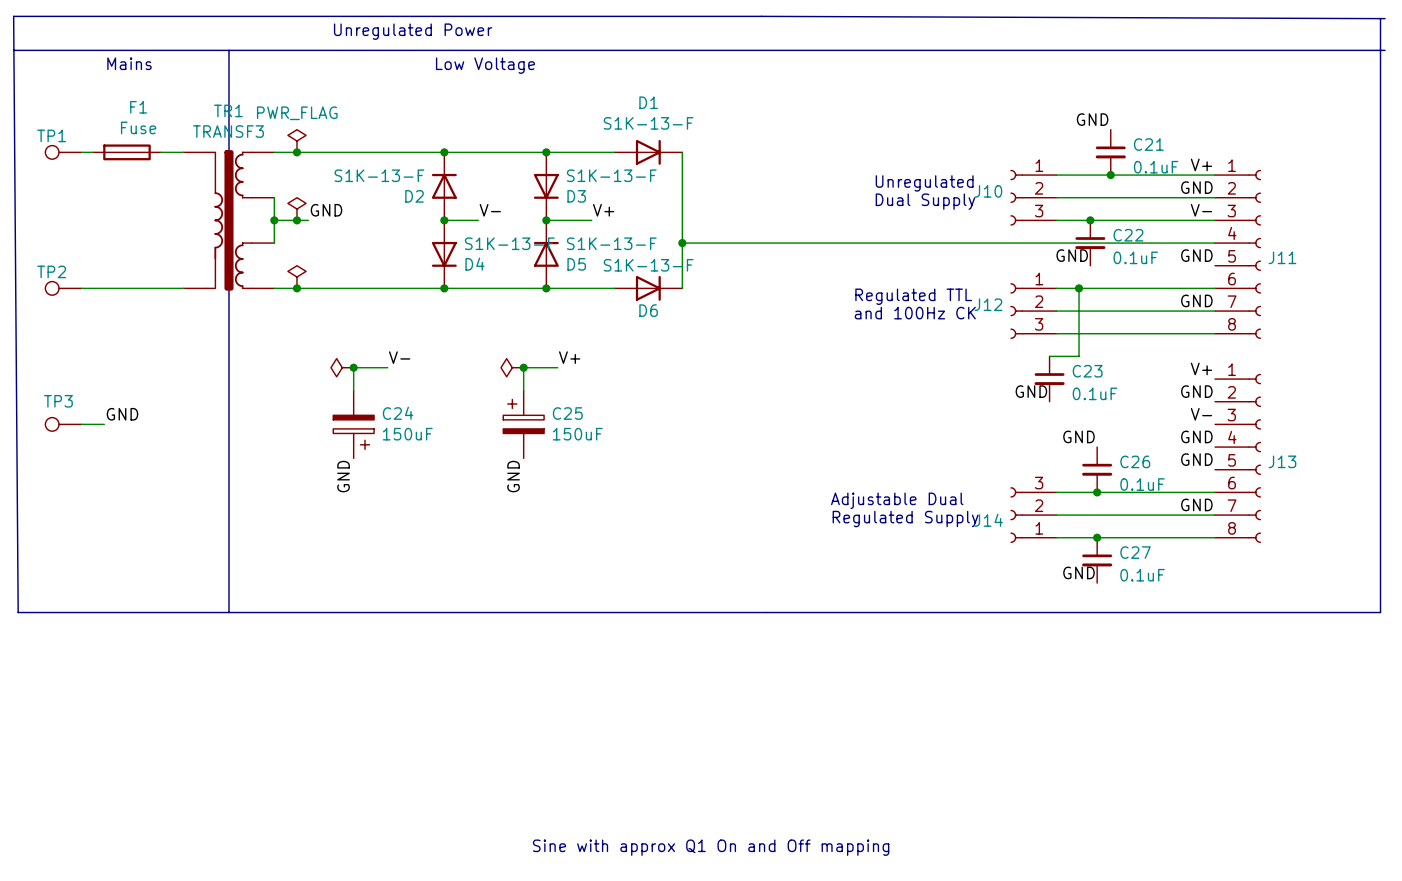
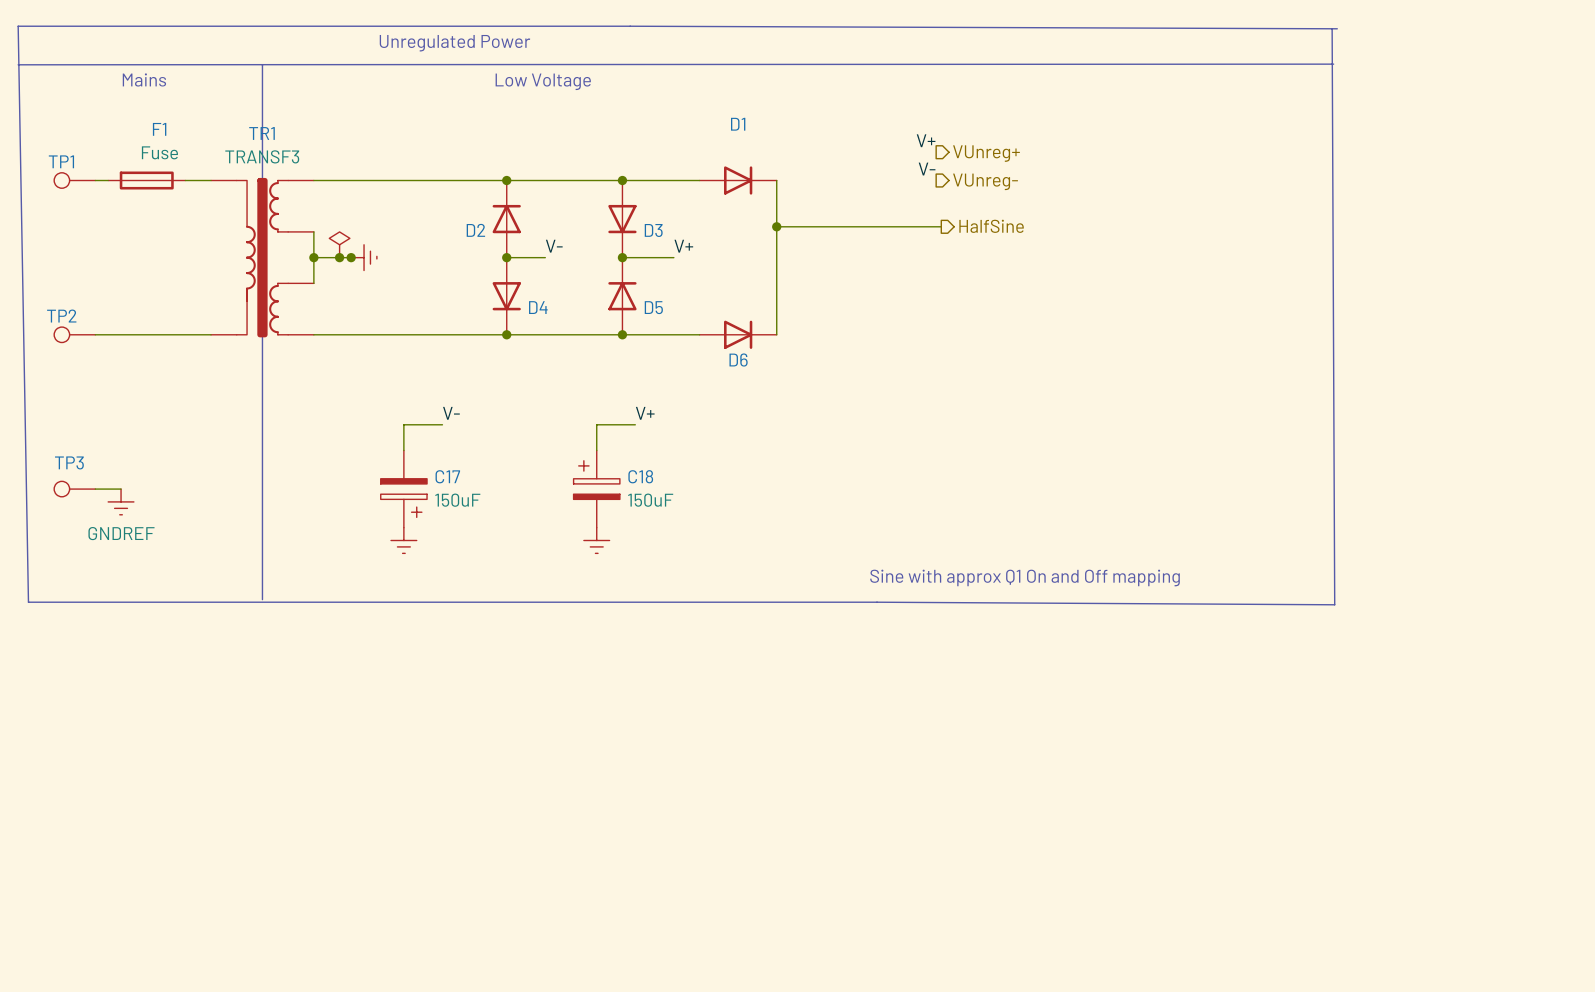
line: (13, 16) (18, 612) (1380, 612) (1380, 18) -> (18, 26) (28, 602) (877, 602) (1334, 604) (1332, 28)
line: (553, 16) (1385, 18) -> (630, 26) (1337, 28)
line: (13, 50) (1385, 50) -> (18, 64) (1333, 64)
label: none -> V+ (926, 140)
label: GND (1092, 119) -> none
D1 value: S1K-13-F (648, 123) -> none
hierarchical label: none -> VUnreg+ (986, 153)
power symbol: PWR_FLAG (296, 141) -> none
label: none -> V- (927, 169)
junction: (296, 152) -> none
C21: 0.1uF (1110, 152) -> none
hierarchical label: none -> VUnreg- (985, 181)
label: V+ (1201, 164) -> none
D2 value: S1K-13-F (379, 175) -> none
D3 value: S1K-13-F (611, 175) -> none
wire: (1056, 175) (1215, 175) -> none
junction: (1110, 175) -> none
text: Unregulated (924, 183) -> none
label: GND (1196, 187) -> none
hierarchical label: none -> HalfSine (991, 226)
wire: none -> (776, 226) (941, 226)
J10: (1033, 197) -> none
wire: (1056, 197) (1215, 197) -> none
text: Dual Supply (925, 201) -> none
label: GND (326, 210) -> none
label: V- (1201, 210) -> none
junction: none -> (351, 257)
power symbol: none -> (364, 257)
wire: (1056, 220) (1215, 220) -> none
junction: (1090, 220) -> none
D4 value: S1K-13-F (509, 243) -> none
D5 value: S1K-13-F (611, 243) -> none
wire: (682, 243) (1215, 243) -> none
junction position: (682, 243) -> (776, 226)
C22: 0.1uF (1090, 243) -> none
J11: (1238, 254) -> none
label: GND (1072, 255) -> none
label: GND (1196, 255) -> none
D6 value: S1K-13-F (648, 265) -> none
power symbol: (296, 277) -> none
junction: (296, 288) -> none
wire: (1056, 288) (1215, 288) -> none
wire: (1079, 288) (1079, 356) (1049, 356) -> none
junction: (1079, 288) -> none
text: Regulated TTL (913, 296) -> none
label: GND (1196, 300) -> none
J12: (1033, 311) -> none
wire: (1056, 311) (1215, 311) -> none
text: and 100Hz CK (915, 313) -> none
wire: (1056, 333) (1215, 333) -> none
power symbol: (342, 367) -> none
junction: (353, 367) -> none
power symbol: (512, 367) -> none
junction: (523, 367) -> none
label: V+ (1201, 368) -> none
C23: 0.1uF (1049, 379) -> none
label: GND (1031, 391) -> none
label: GND (1196, 391) -> none
C24 name: C24 (398, 413) -> C17 (447, 476)
C25 name: C25 (567, 413) -> C18 (640, 476)
label: GND (122, 414) -> none
label: V- (1201, 414) -> none
power symbol: none -> GNDREF (121, 501)
label: GND (1078, 436) -> none
label: GND (1196, 436) -> none
J13: (1238, 458) -> none
label: GND (1196, 459) -> none
power symbol: none -> (403, 540)
power symbol: none -> (596, 540)
C26: 0.1uF (1097, 469) -> none
label: GND (343, 476) -> none
label: GND (513, 476) -> none
wire: (1056, 492) (1215, 492) -> none
junction: (1097, 492) -> none
text: Adjustable Dual (897, 500) -> none
text: none -> Sine with approx Q1 On and Off mapping (1025, 577)
label: GND (1196, 504) -> none
J14: (1033, 515) -> none
wire: (1056, 515) (1215, 515) -> none
text: Regulated Supply (905, 519) -> none
line: (228, 521) (228, 612) -> none
wire: (1056, 537) (1215, 537) -> none
junction: (1097, 537) -> none
C27: 0.1uF (1097, 560) -> none
label: GND (1078, 572) -> none
text: Sine with approx Q1 On and Off mapping (711, 847) -> none

